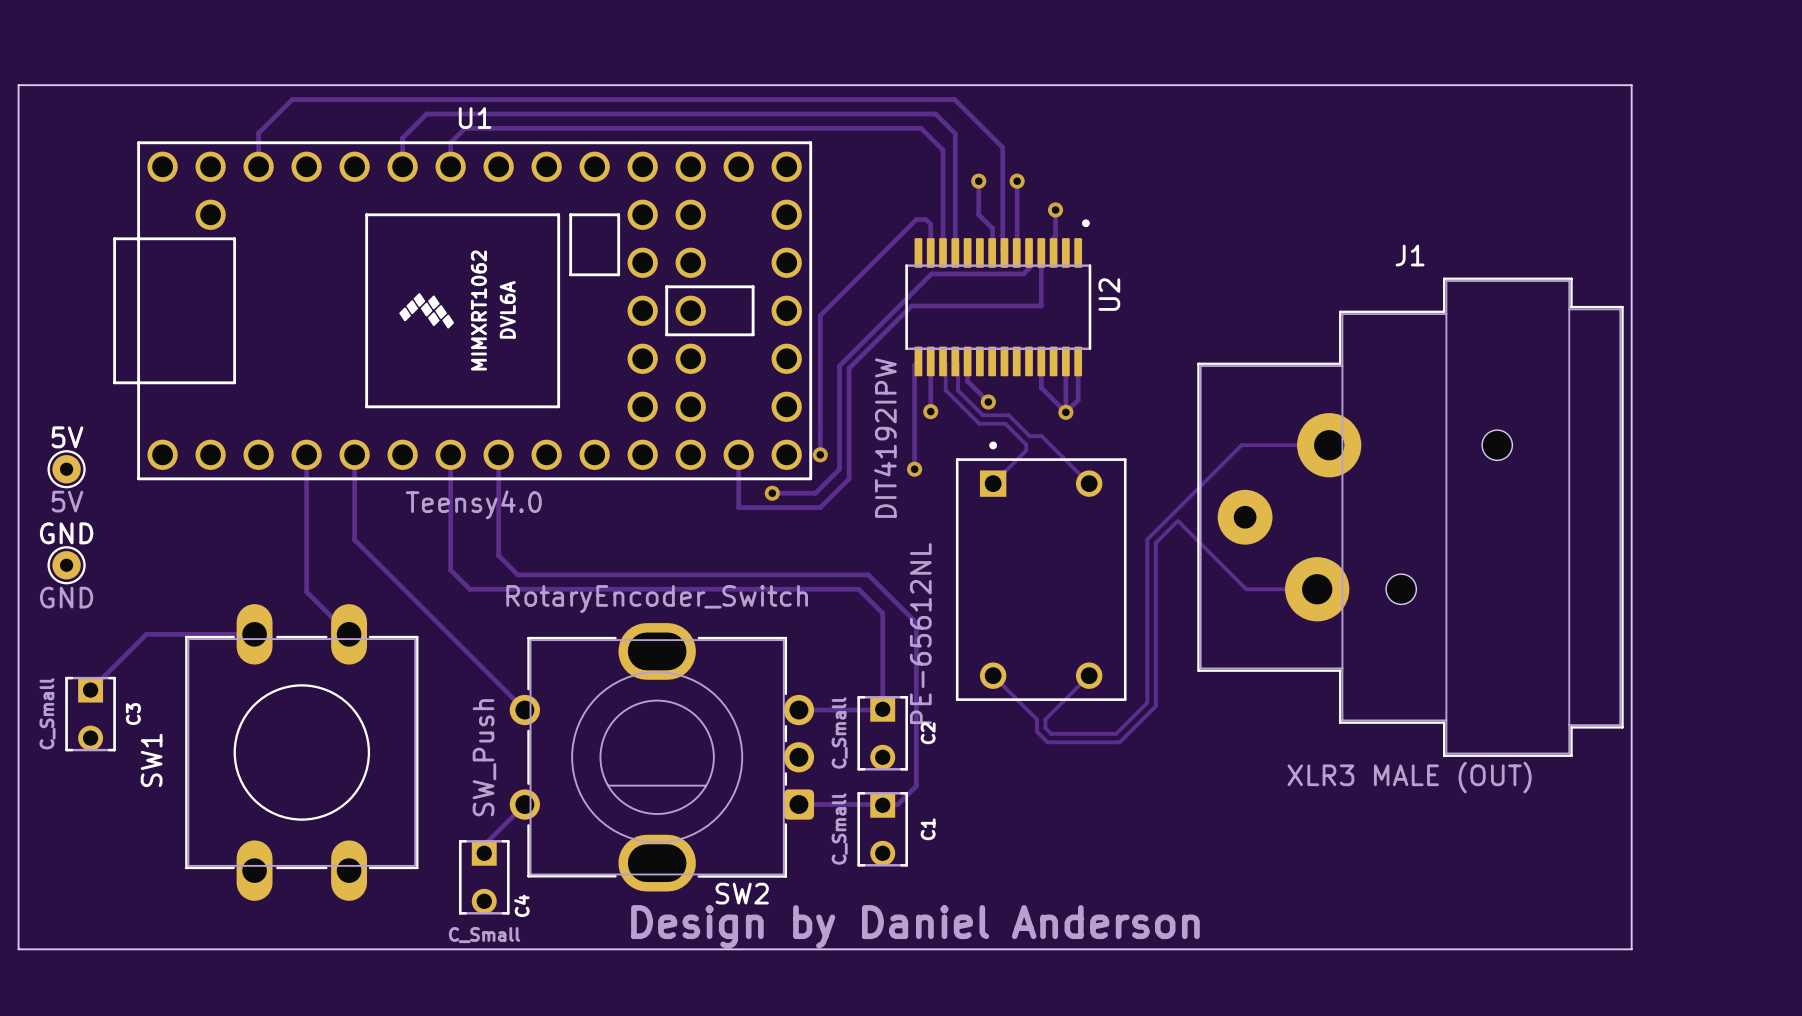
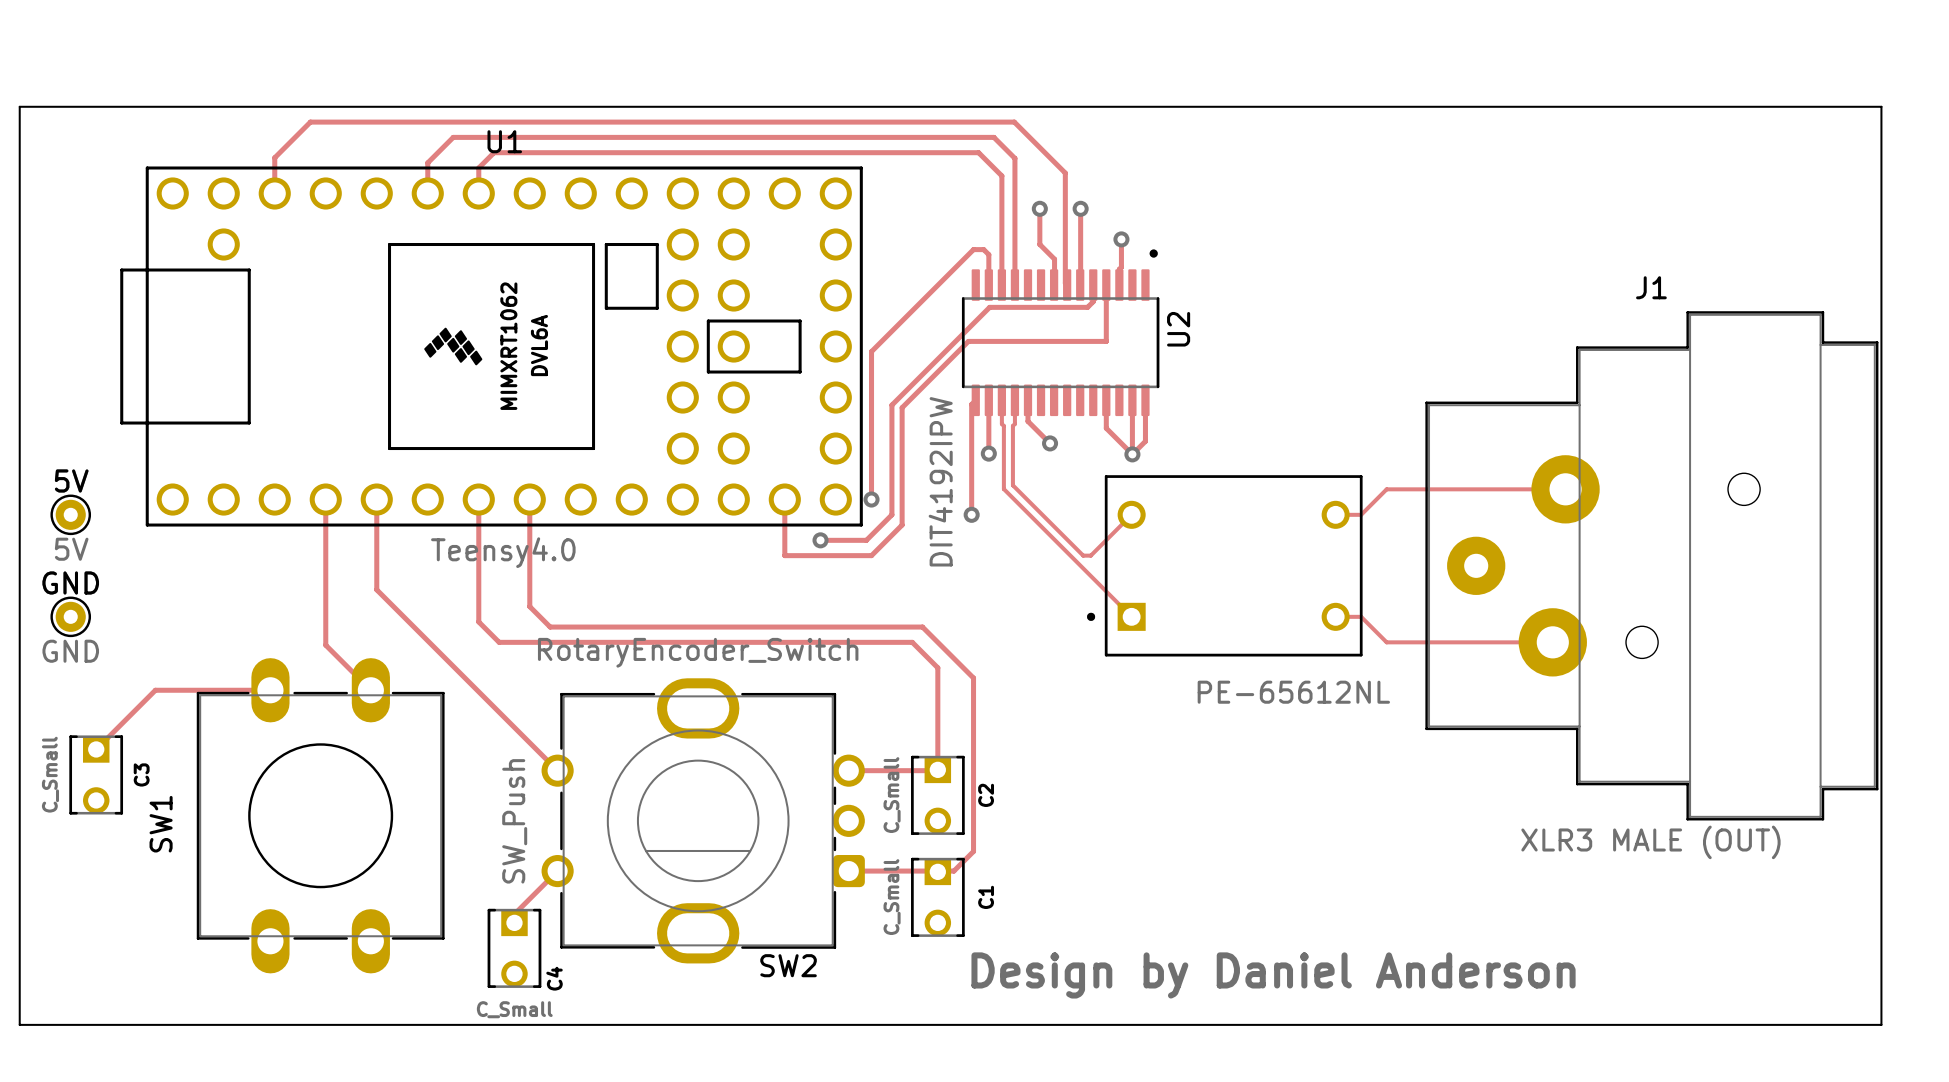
board edge: (1631, 85) (1631, 949) -> (1733, 106) (1881, 106) (1881, 1024) (1733, 1024)
track: (943, 361) (945, 364) (945, 390) (979, 423) (1005, 423) (1026, 444) (1026, 450) (993, 483) -> (1001, 400) (1003, 489) (1131, 616)
track: (955, 361) (958, 364) (958, 390) (982, 415) (1008, 415) (1029, 436) (1041, 436) (1089, 483) -> (1014, 400) (1012, 485) (1083, 555) (1090, 555) (1131, 514)
track: (1305, 445) (1241, 445) (1147, 539) (1147, 702) (1116, 733) (1051, 733) (1045, 728) (1045, 719) (1089, 675) -> (1386, 489) (1361, 514) (1335, 514)
track: none -> (1412, 489) (1565, 489)
J1 position: (1410, 517) -> (1651, 565)
part rotation: 0° (1041, 571) -> 90° counterclockwise (1224, 565)
track: (1305, 589) (1246, 589) (1177, 521) (1155, 543) (1155, 706) (1119, 742) (1047, 742) (1036, 731) (1036, 719) (993, 675) -> (1386, 642) (1361, 616) (1335, 616)
track: none -> (1399, 642) (1552, 642)
text position: Design by Daniel Anderson (915, 926) -> Design by Daniel Anderson (1273, 975)

